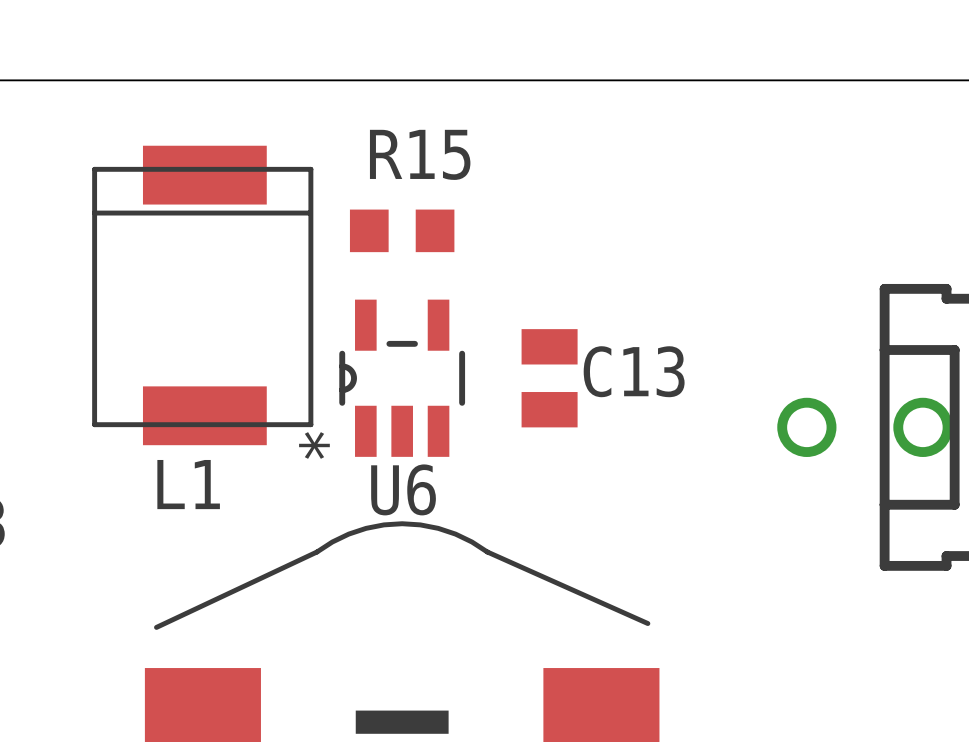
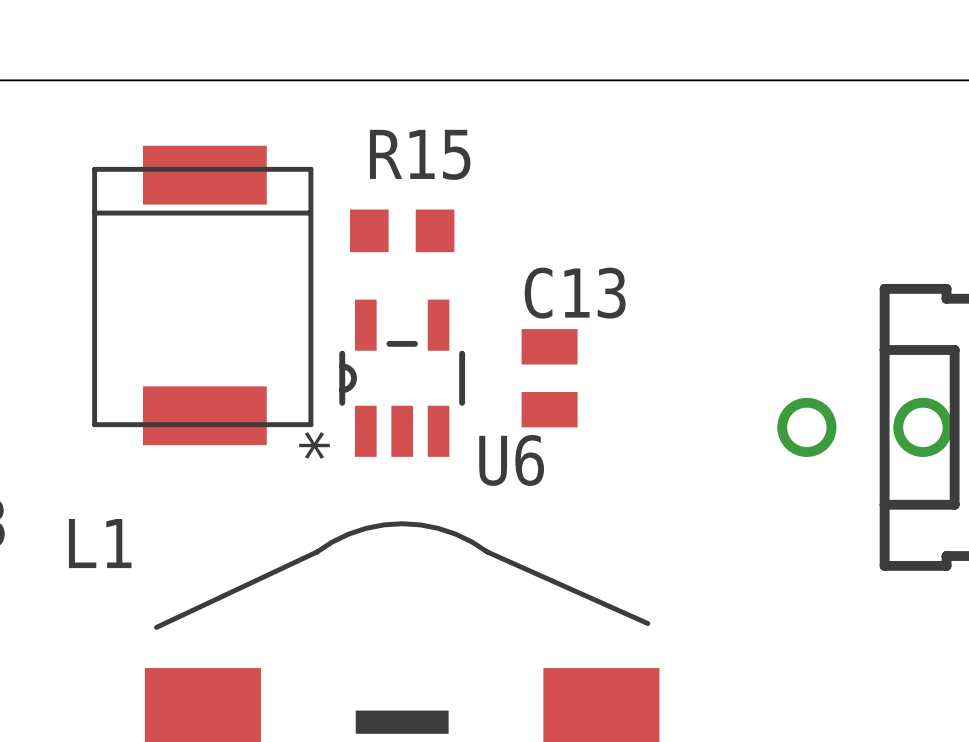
C13 name position: C13 (634, 371) -> C13 (575, 293)
L1 name position: L1 (188, 484) -> L1 (100, 543)
U6 name position: U6 (403, 489) -> U6 (511, 460)

